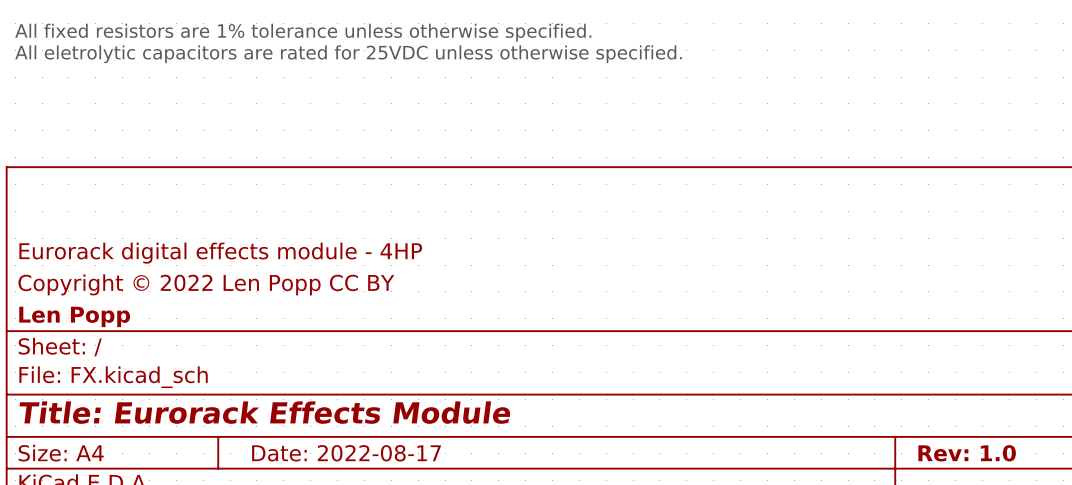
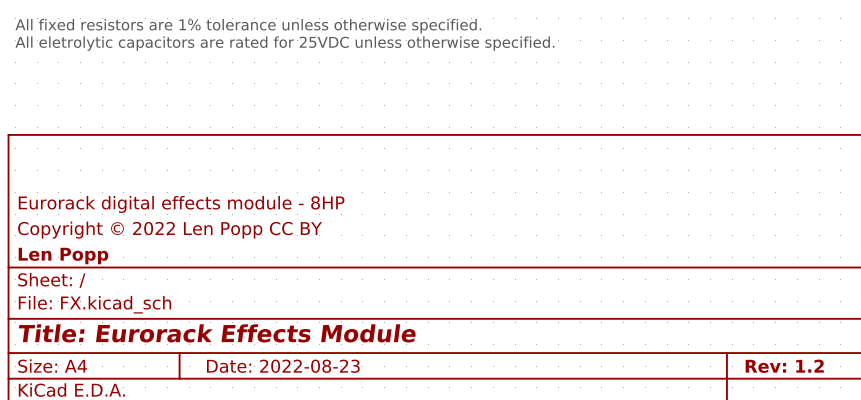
title block: Eurorack digital effects module - 4HP (220, 253) -> Eurorack digital effects module - 8HP (181, 204)
title block: Date: 2022-08-17 (346, 453) -> Date: 2022-08-23 (283, 366)
title block: Rev: 1.0 (967, 453) -> Rev: 1.2 (784, 366)

